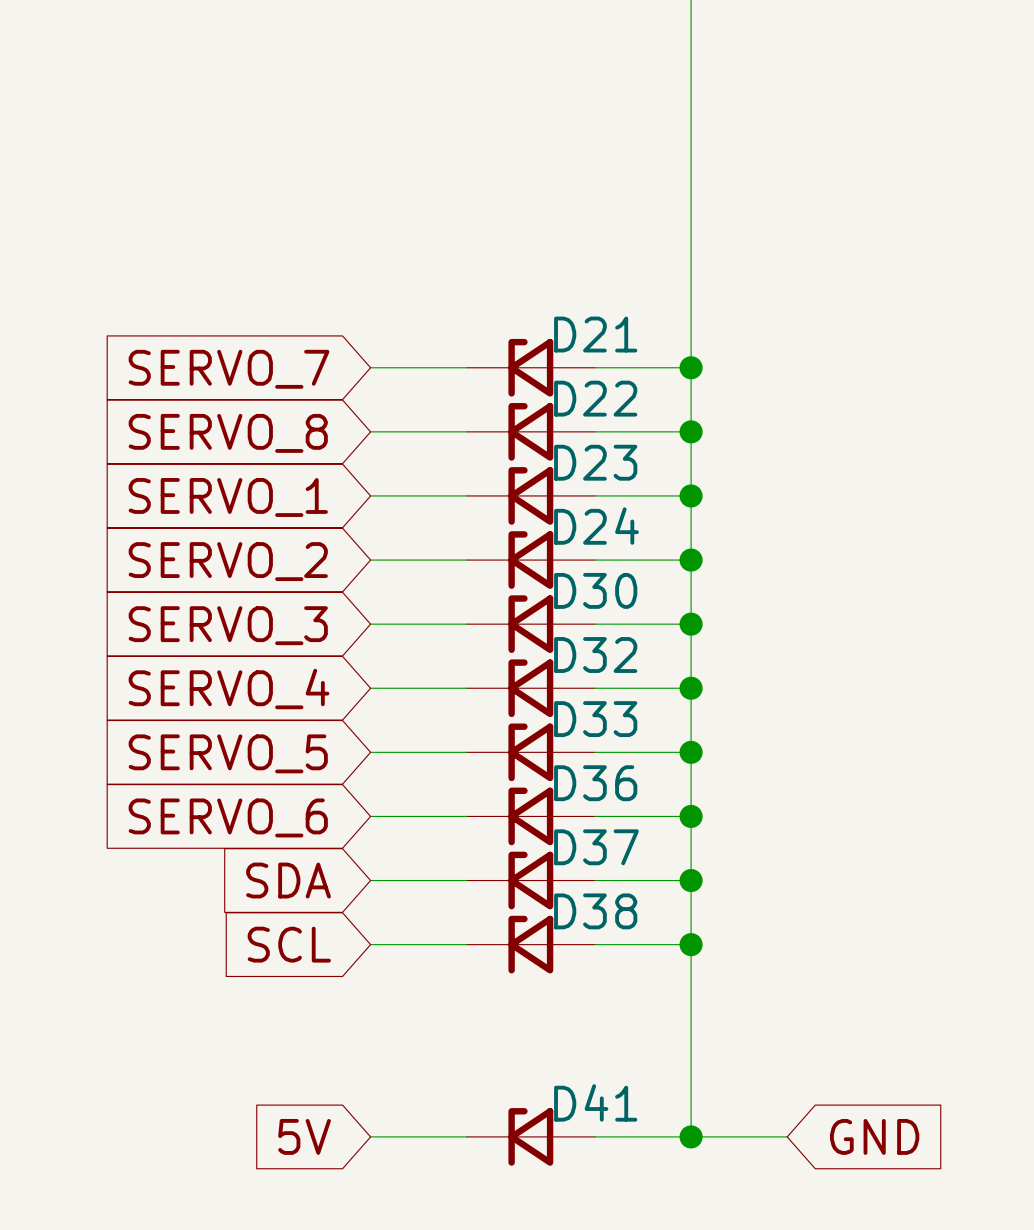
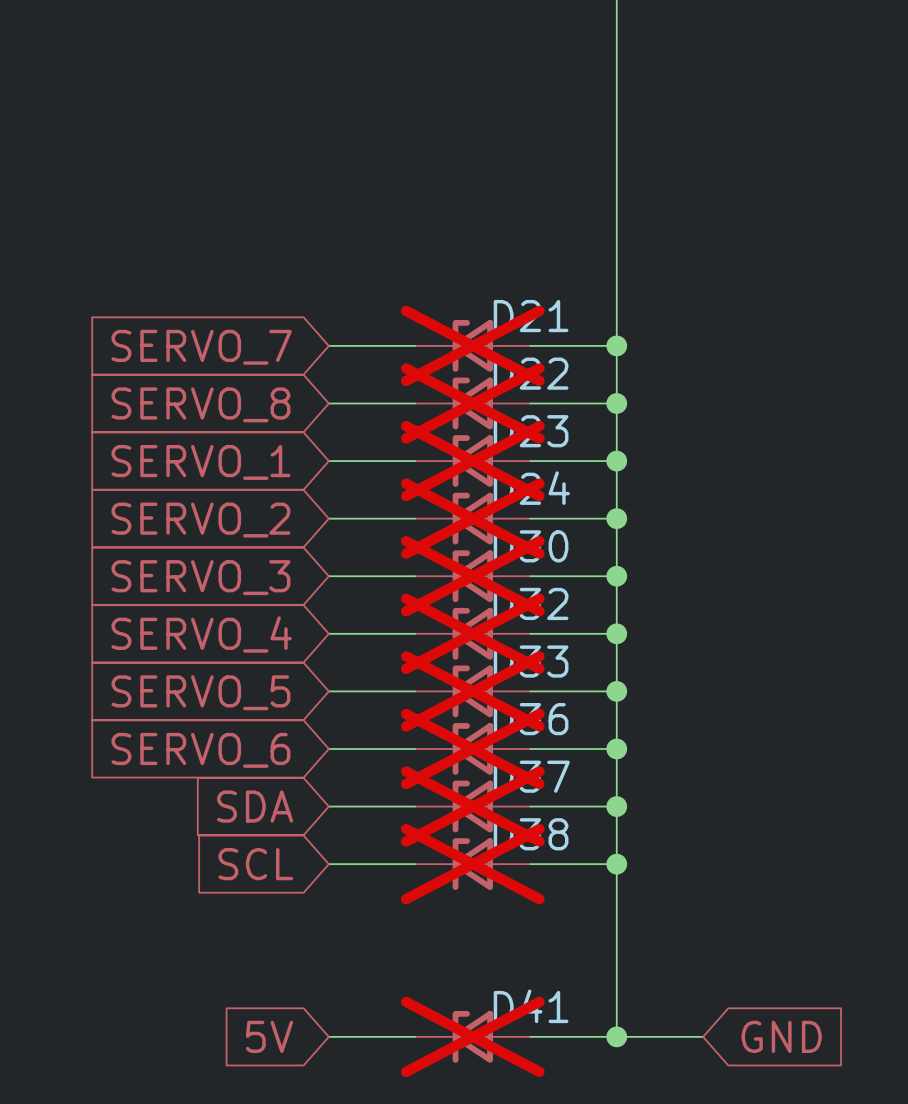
D21 do-not-place cross: none -> (472, 345)
D22 do-not-place cross: none -> (472, 403)
D23 do-not-place cross: none -> (472, 461)
D24 do-not-place cross: none -> (472, 518)
D30 do-not-place cross: none -> (472, 576)
D32 do-not-place cross: none -> (472, 633)
D33 do-not-place cross: none -> (472, 691)
D36 do-not-place cross: none -> (472, 748)
D37 do-not-place cross: none -> (472, 806)
D38 do-not-place cross: none -> (472, 864)
D41 do-not-place cross: none -> (472, 1036)

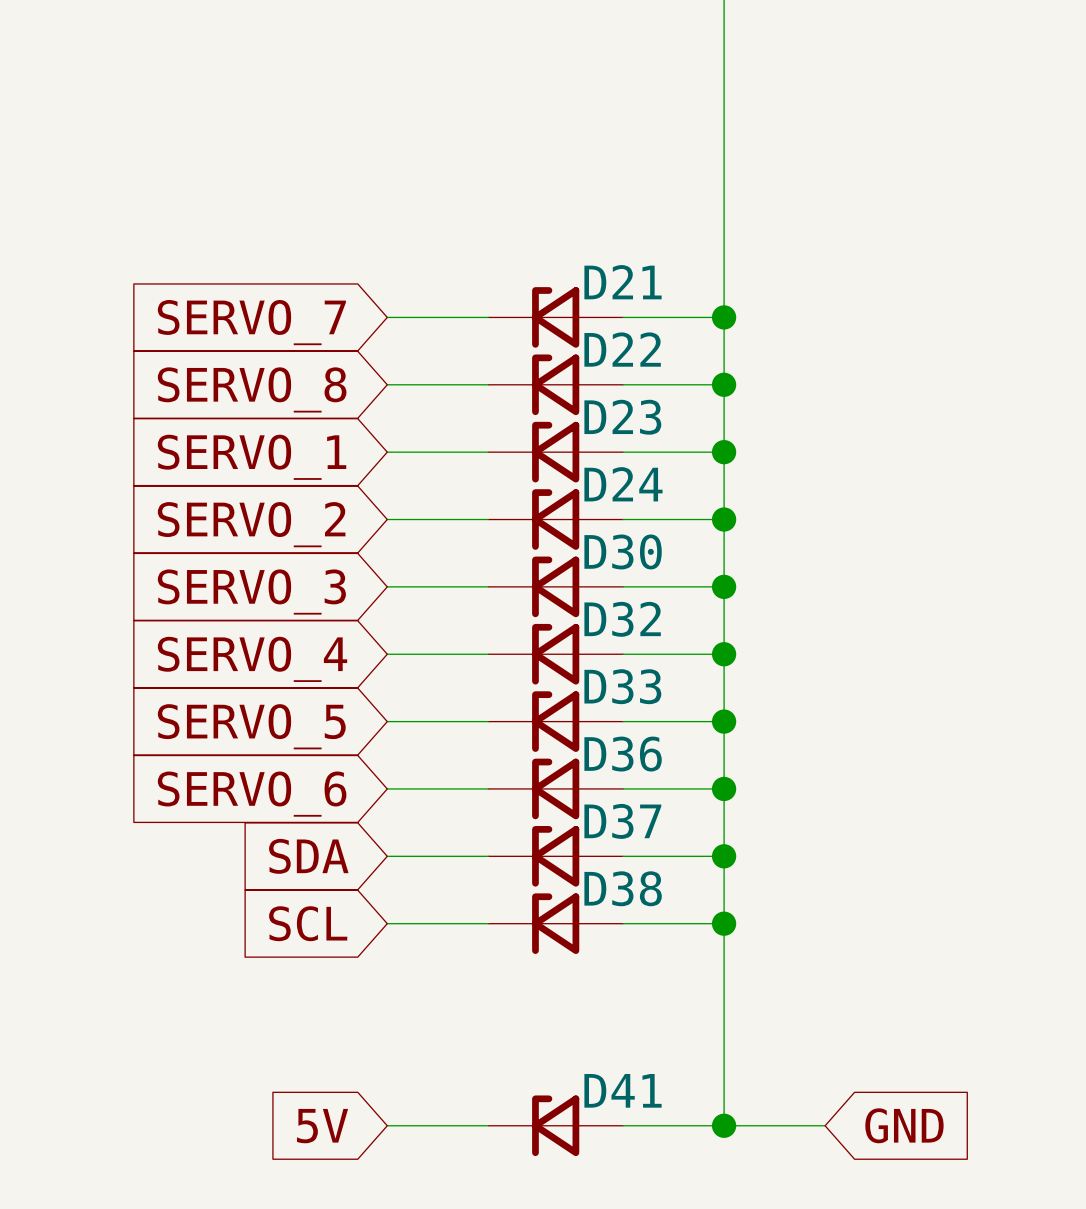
D21 do-not-place cross: (472, 345) -> none
D22 do-not-place cross: (472, 403) -> none
D23 do-not-place cross: (472, 461) -> none
D24 do-not-place cross: (472, 518) -> none
D30 do-not-place cross: (472, 576) -> none
D32 do-not-place cross: (472, 633) -> none
D33 do-not-place cross: (472, 691) -> none
D36 do-not-place cross: (472, 748) -> none
D37 do-not-place cross: (472, 806) -> none
D38 do-not-place cross: (472, 864) -> none
D41 do-not-place cross: (472, 1036) -> none

